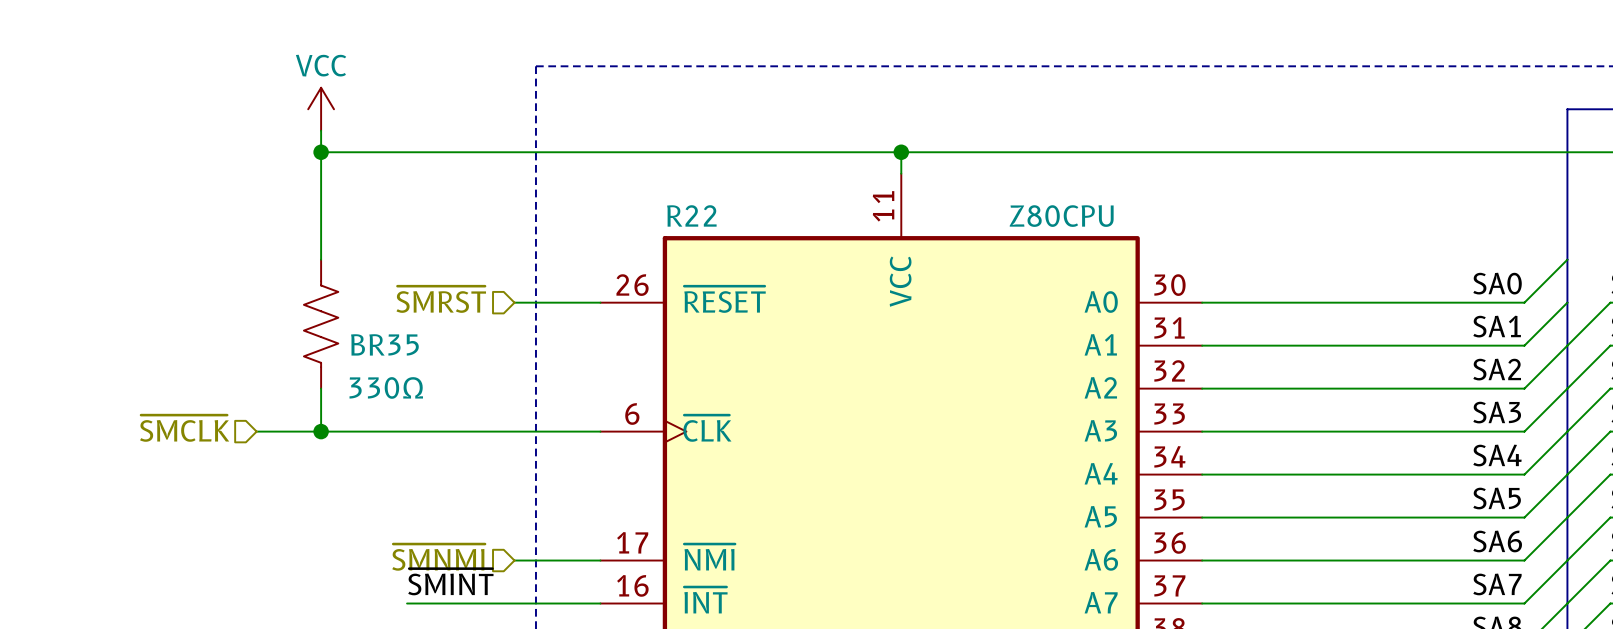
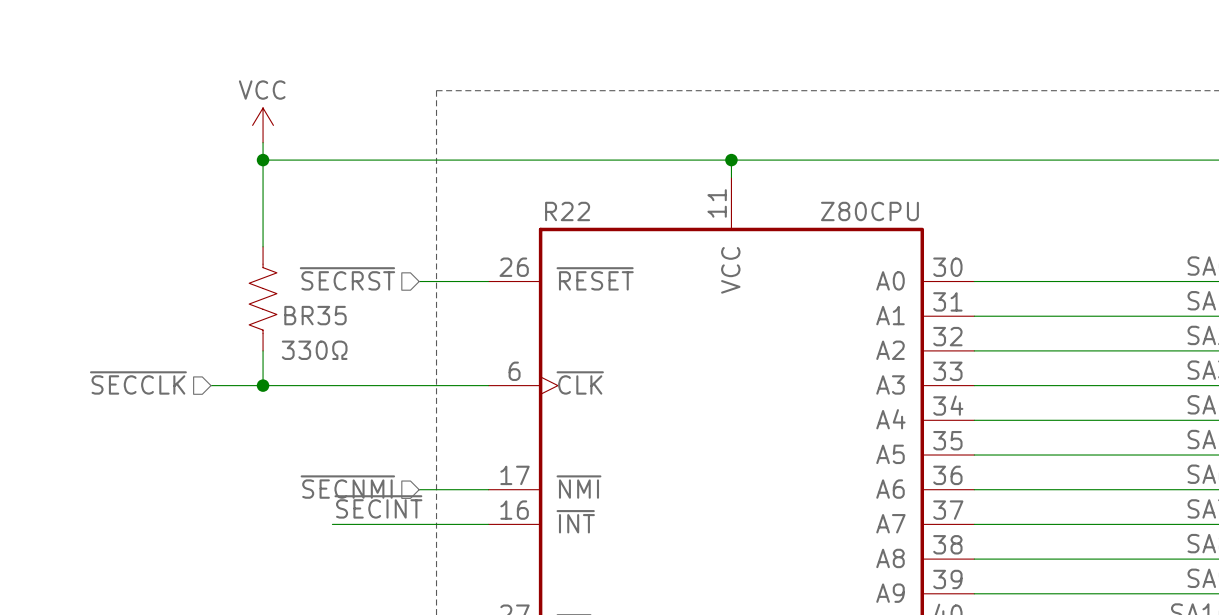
hierarchical label: ~{SMRST} (441, 299) -> ~{SECRST} (347, 278)
hierarchical label: ~{SMCLK} (184, 428) -> ~{SECCLK} (138, 382)
hierarchical label: ~{SMNMI} (438, 557) -> ~{SECNMI} (347, 487)
label: ~{SMINT} (450, 581) -> ~{SECINT} (378, 506)

